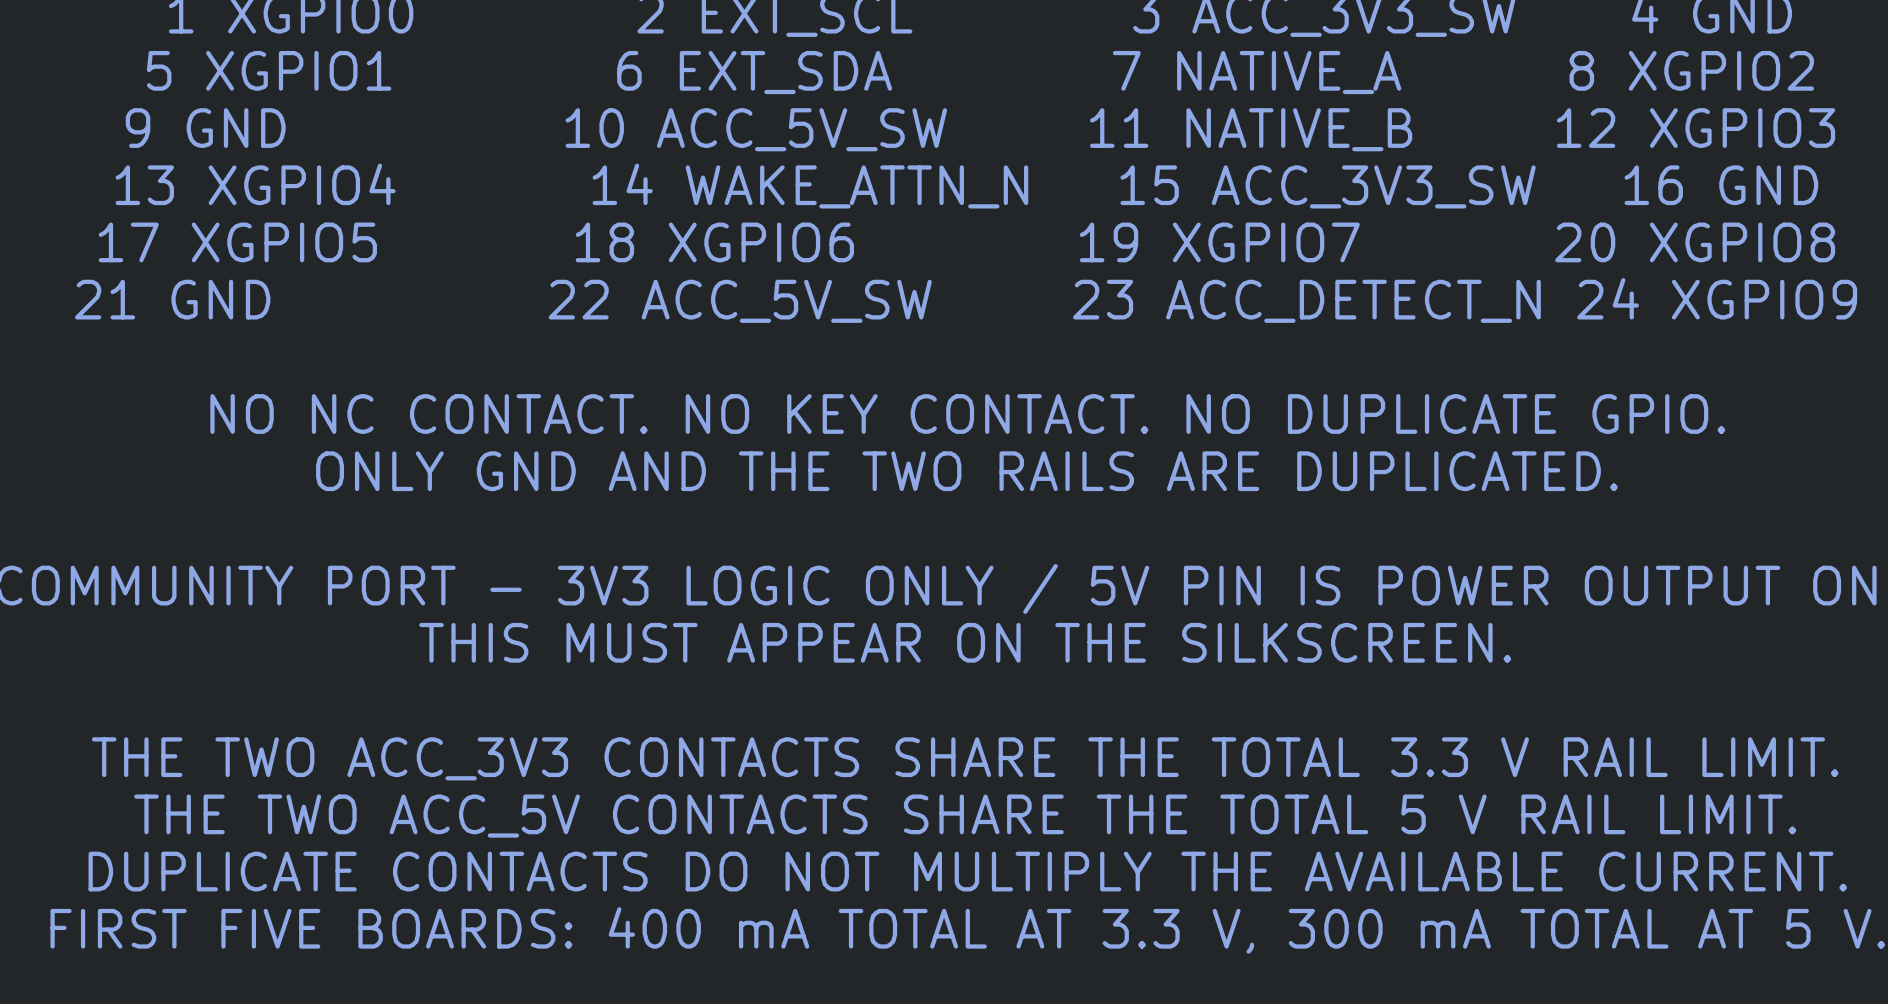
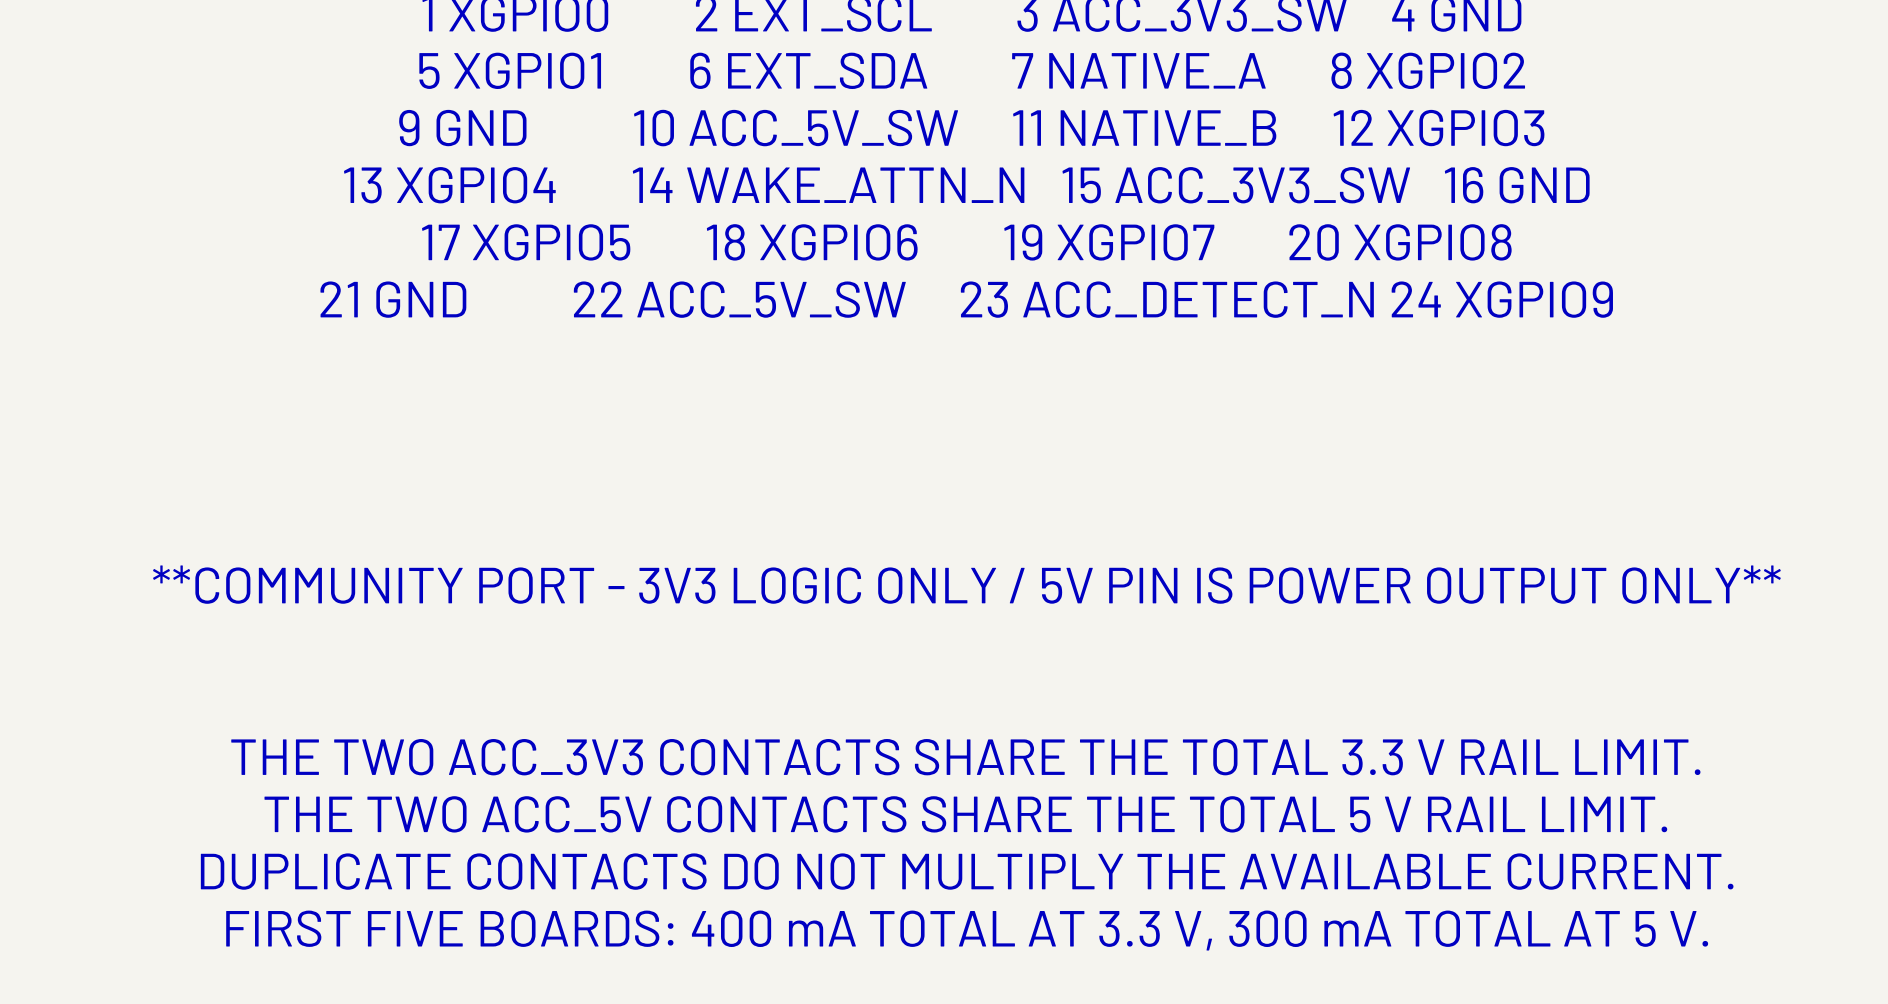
text: NO NC CONTACT. NO KEY CONTACT. NO DUPLICATE GPIO. (967, 414) -> none
text: ONLY GND AND THE TWO RAILS ARE DUPLICATED. (966, 471) -> none
text: THIS MUST APPEAR ON THE SILKSCREEN. (965, 642) -> none

